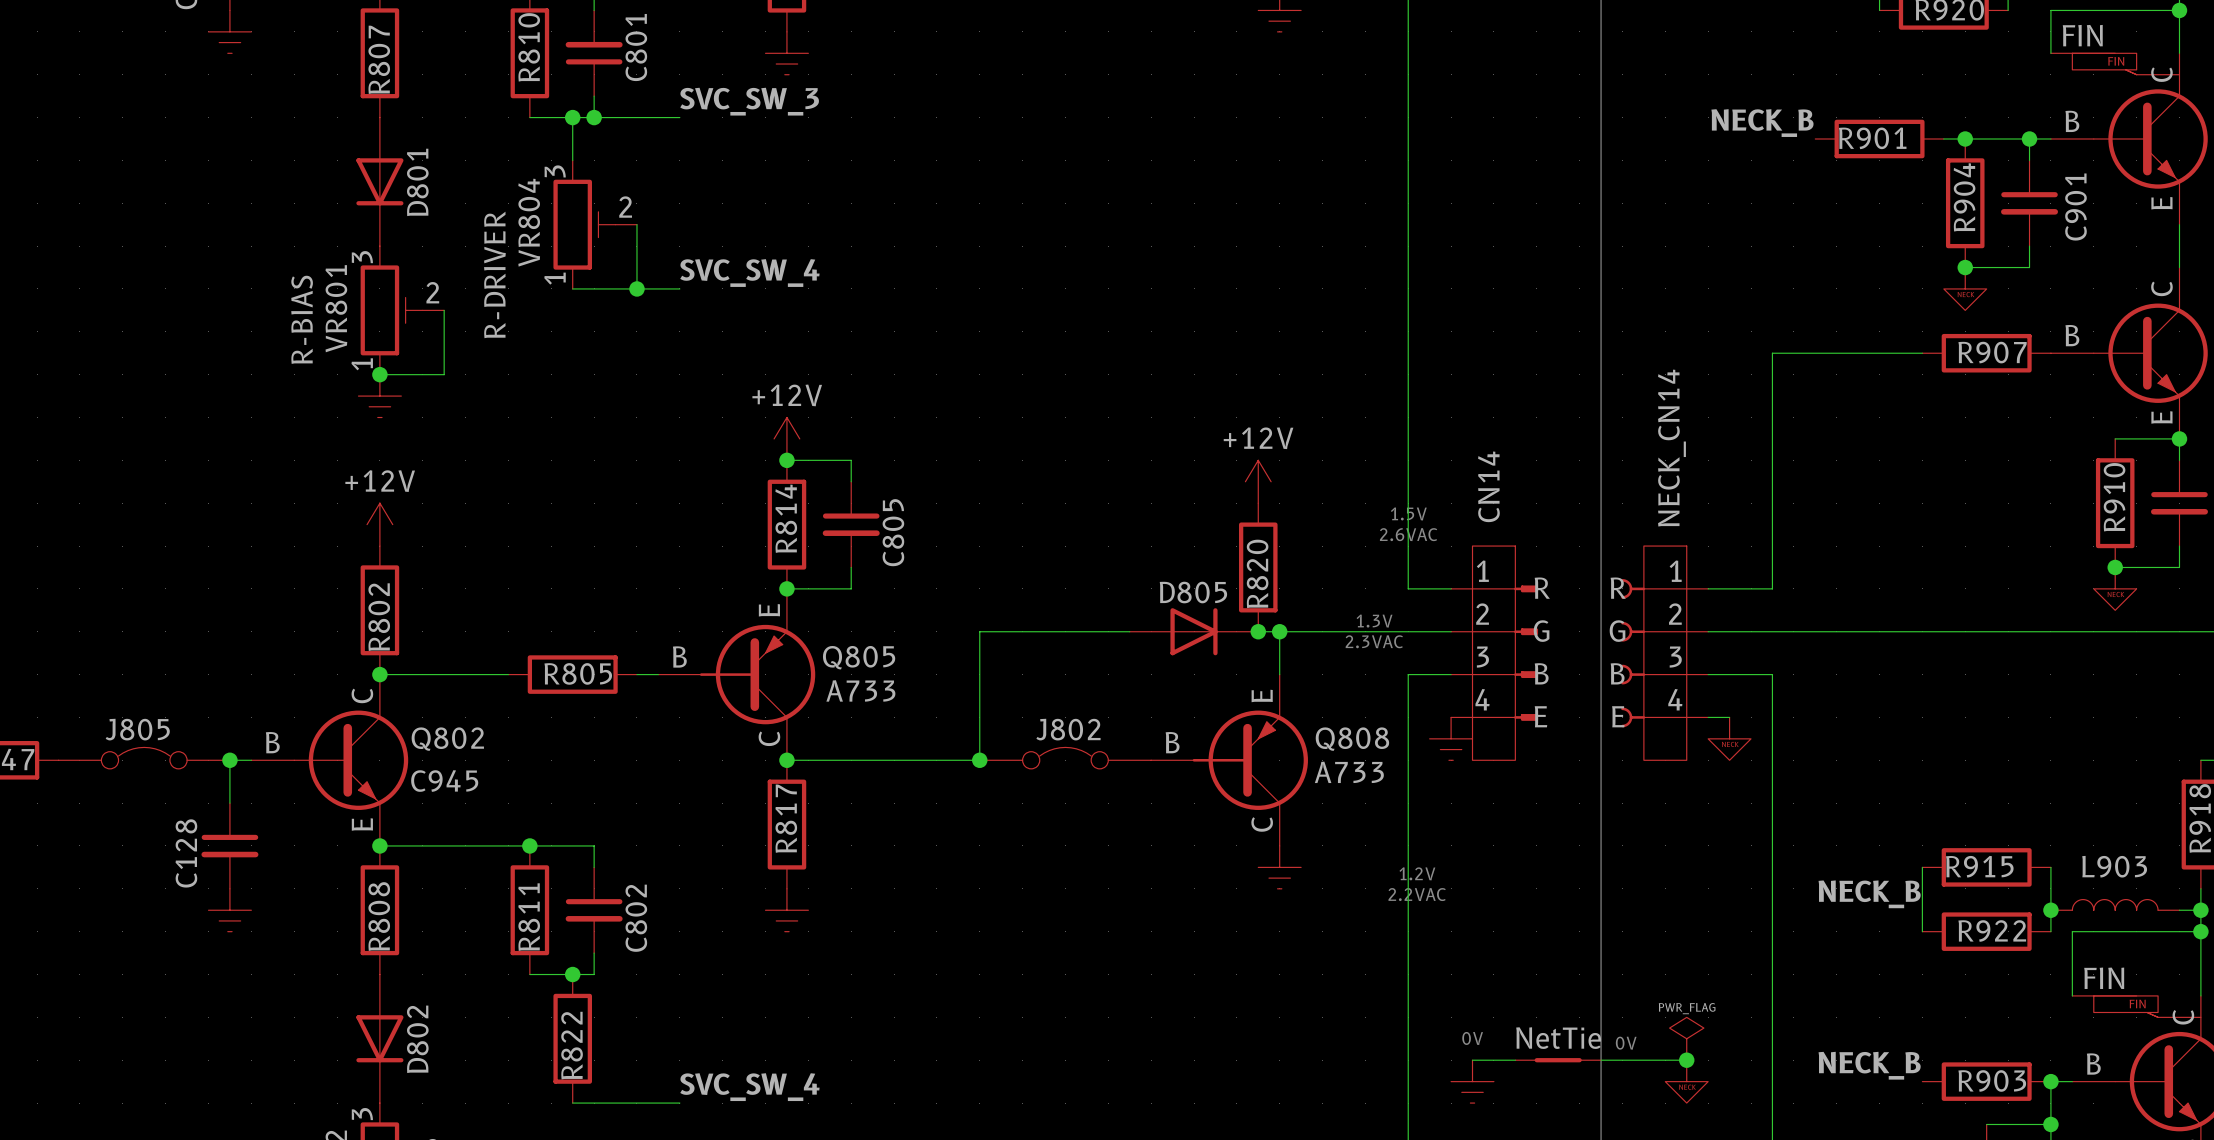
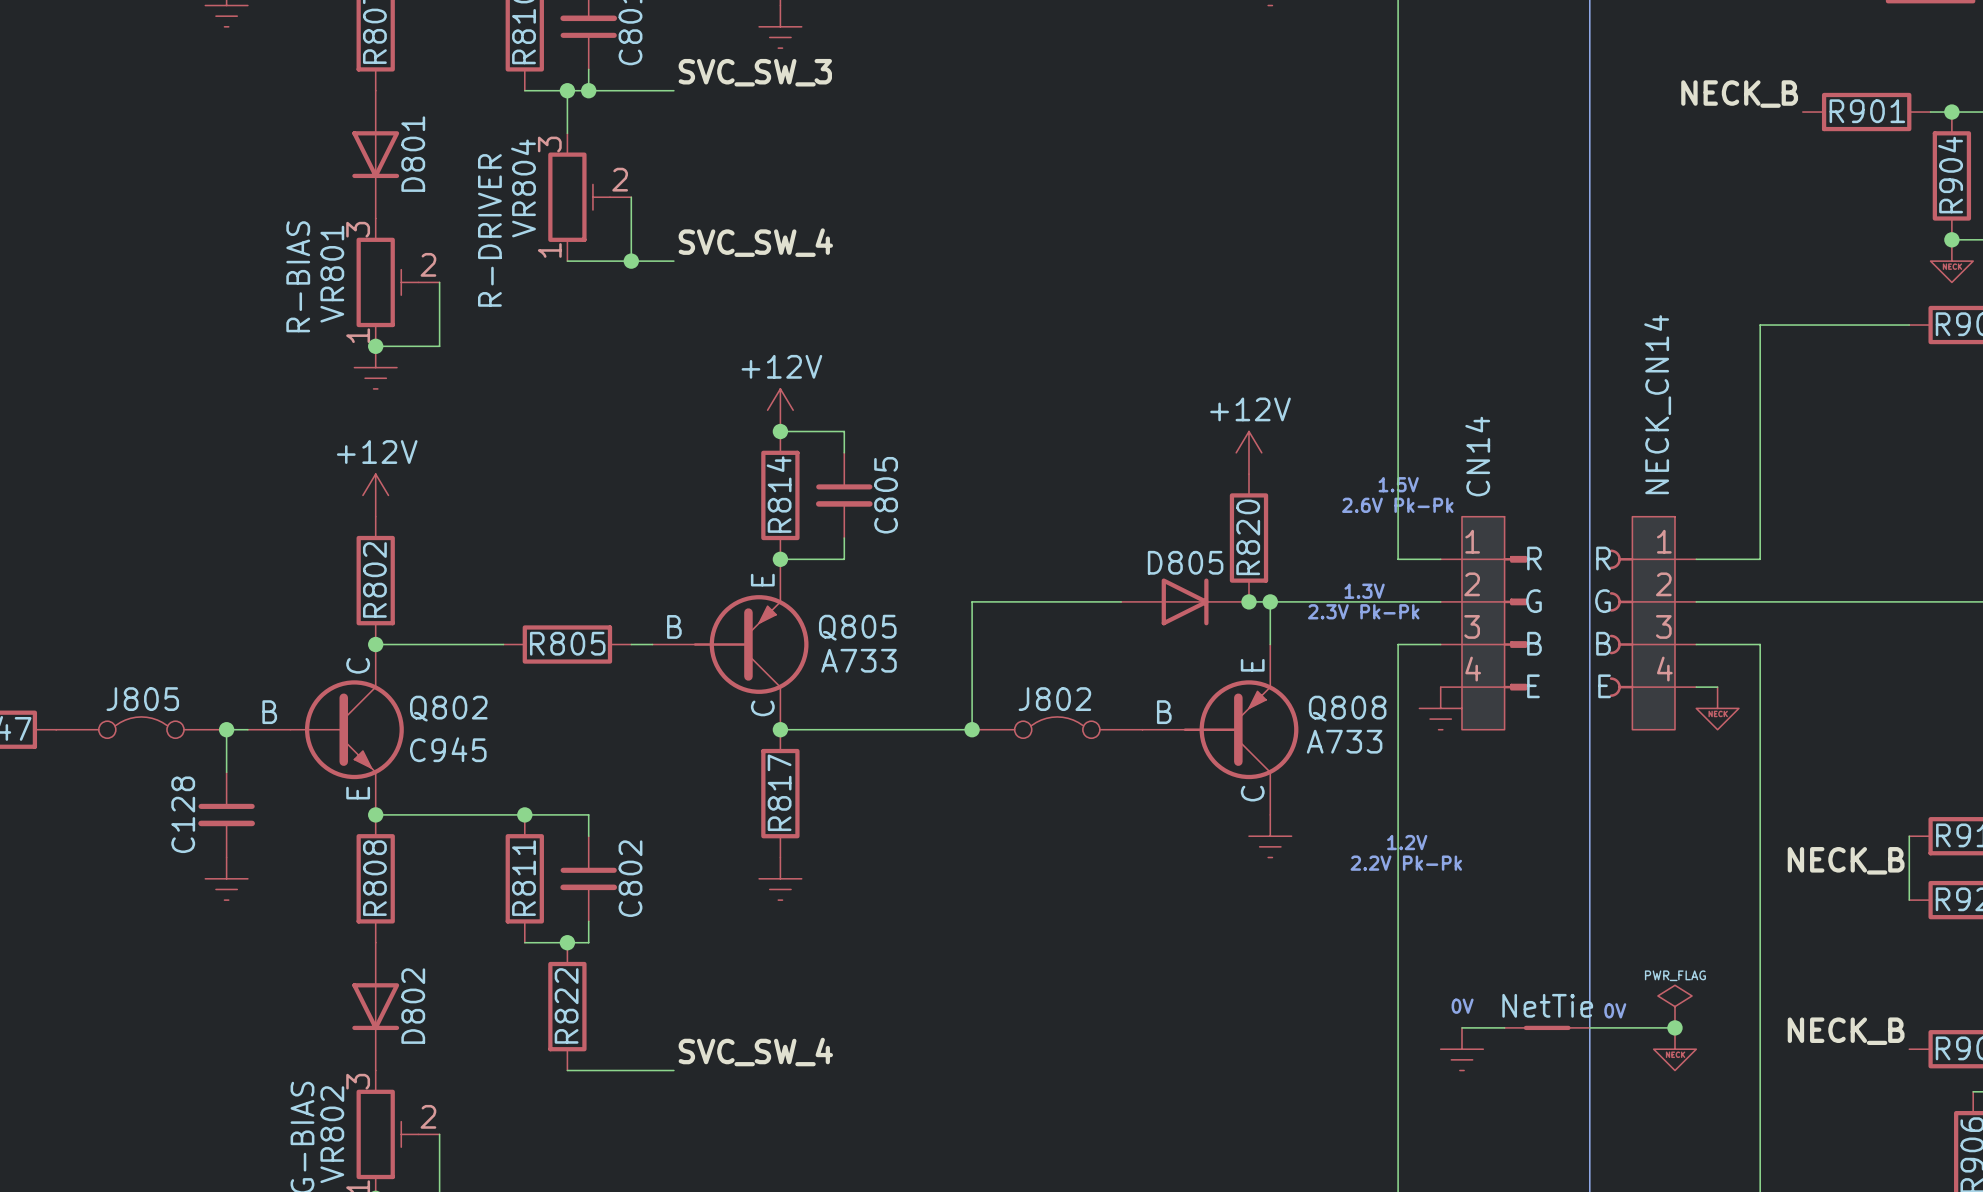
text: 2.6VAC (1408, 534) -> 2.6V Pk-Pk (1397, 505)
text: 2.3VAC (1374, 641) -> 2.3V Pk-Pk (1363, 611)
text: 2.2VAC (1417, 894) -> 2.2V Pk-Pk (1406, 863)

